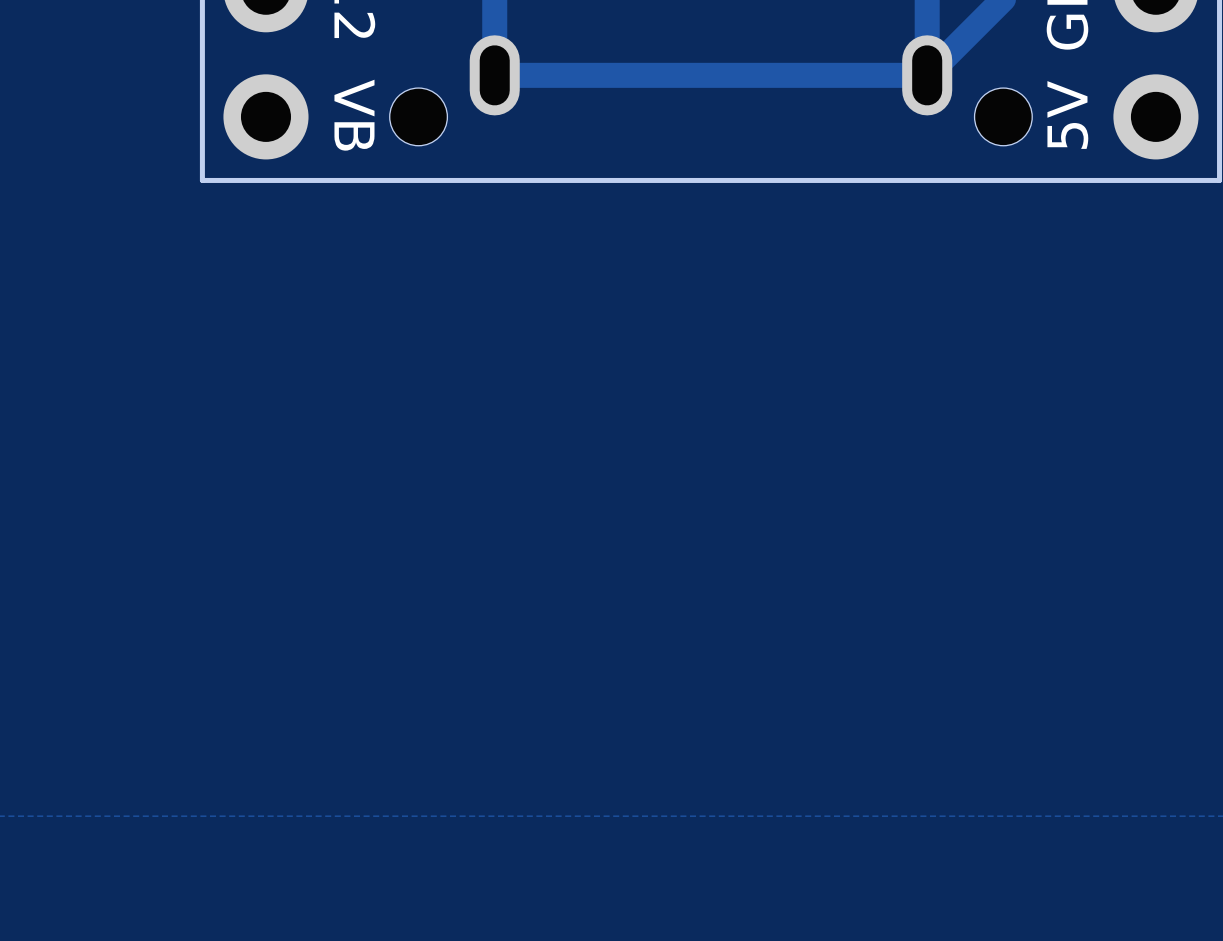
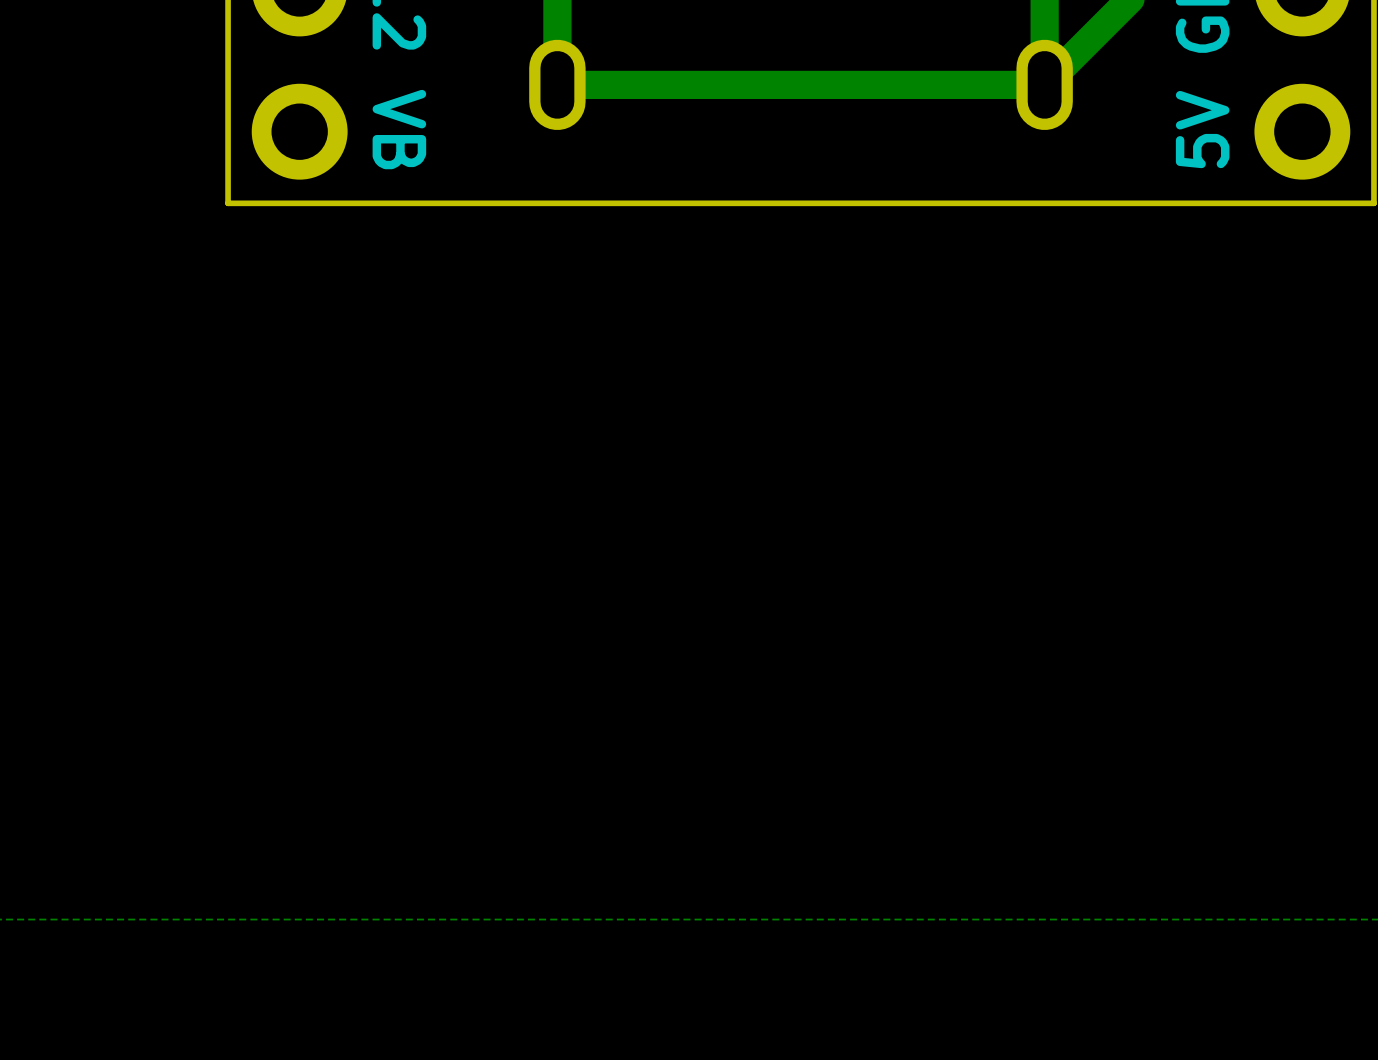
part: (418, 116) -> none
part: (1003, 116) -> none

